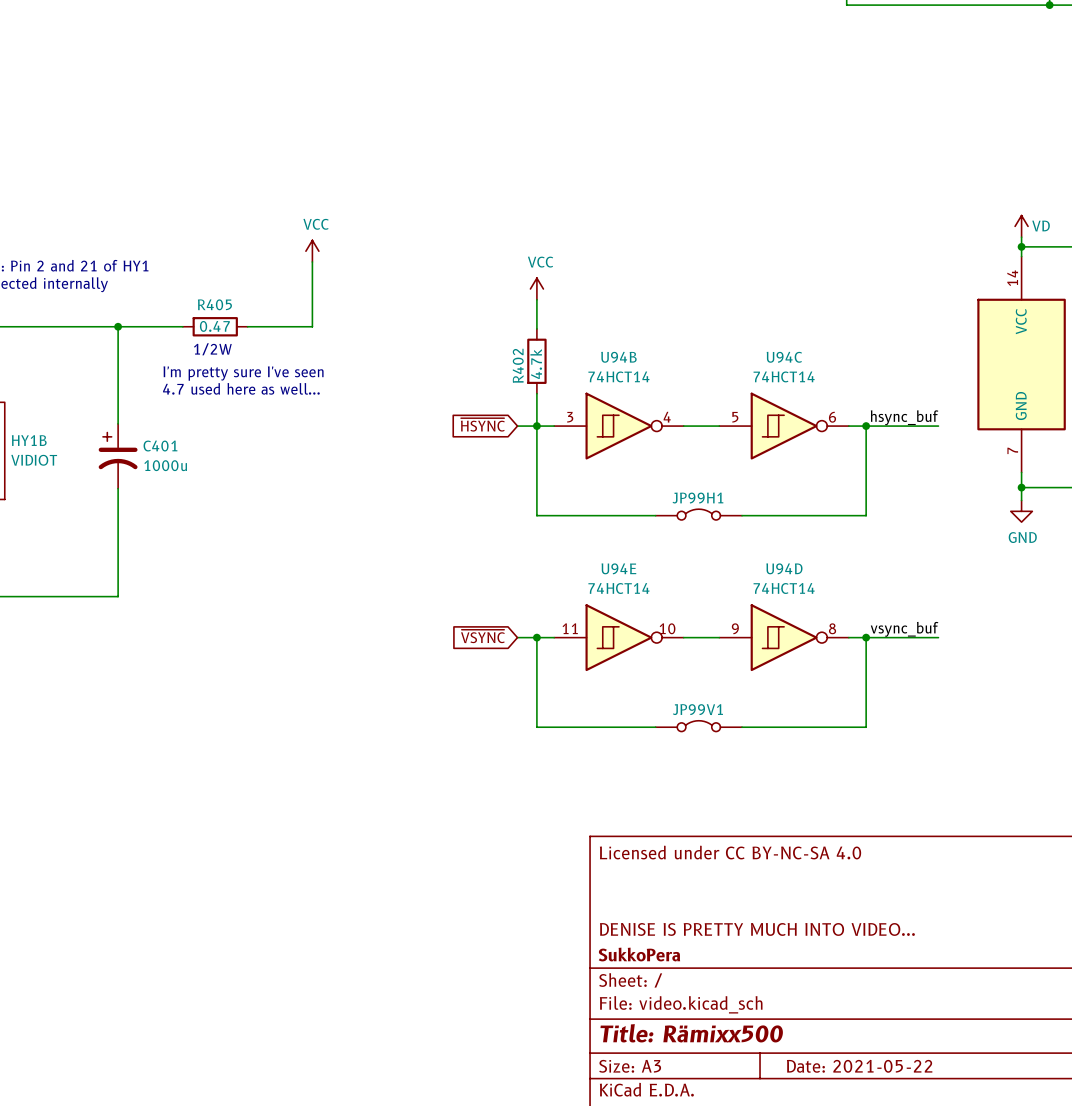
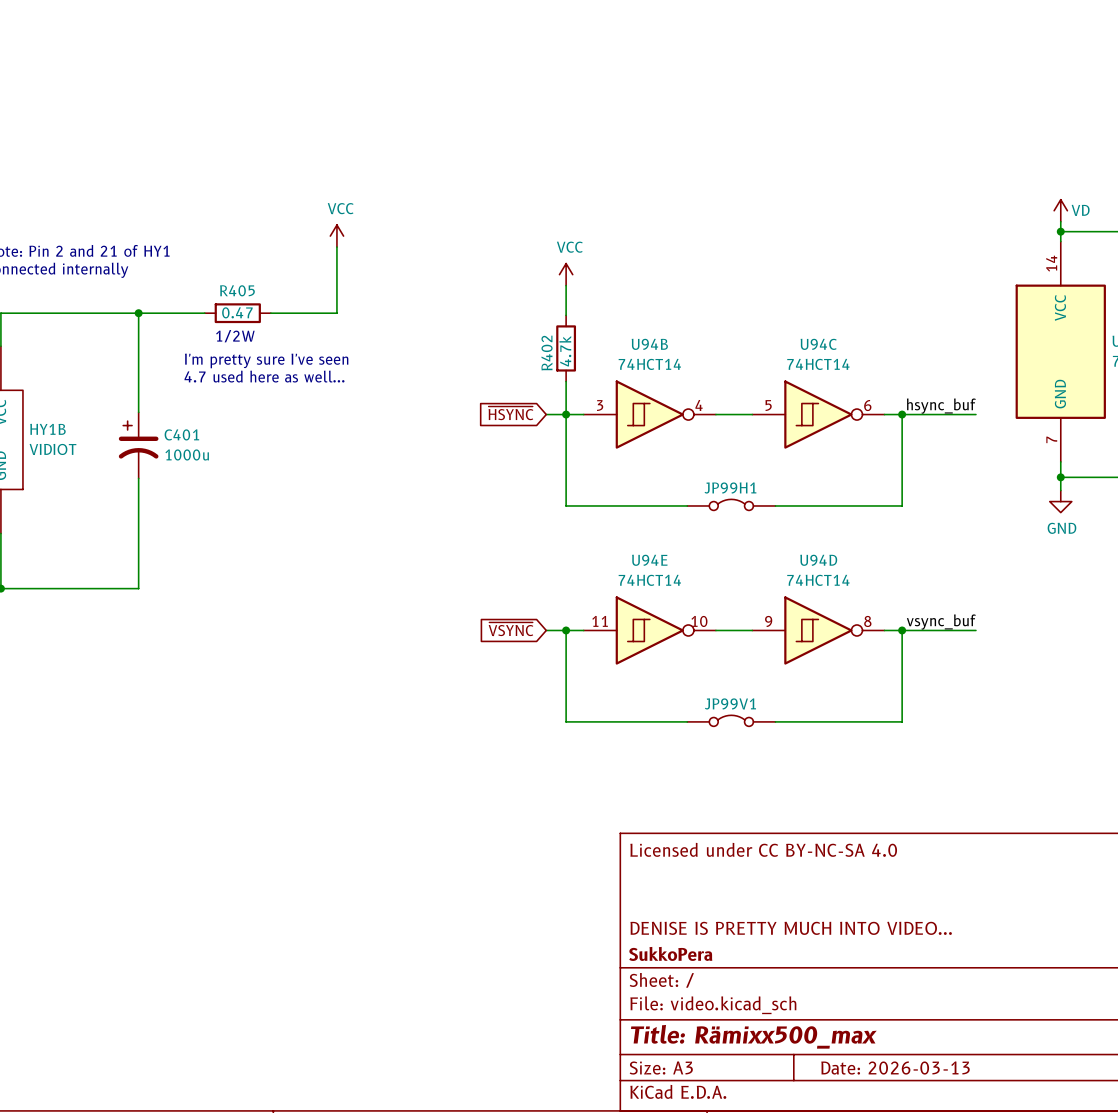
title block: Title: Rämixx500 (691, 1033) -> Title: Rämixx500_max (753, 1036)
title block: Date: 2021-05-22 (859, 1066) -> Date: 2026-03-13 (895, 1068)

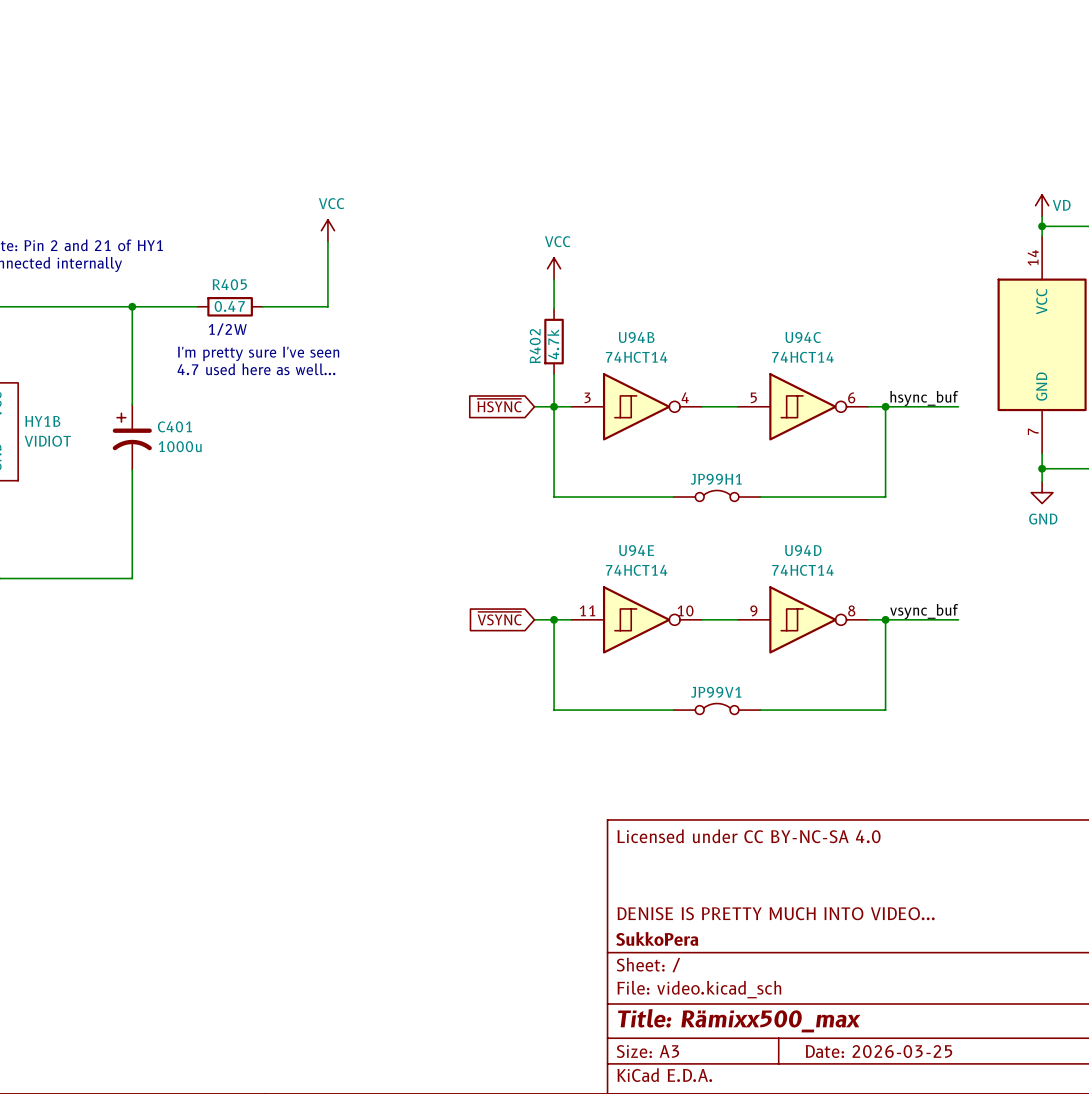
title block: Date: 2026-03-13 (895, 1068) -> Date: 2026-03-25 (879, 1051)

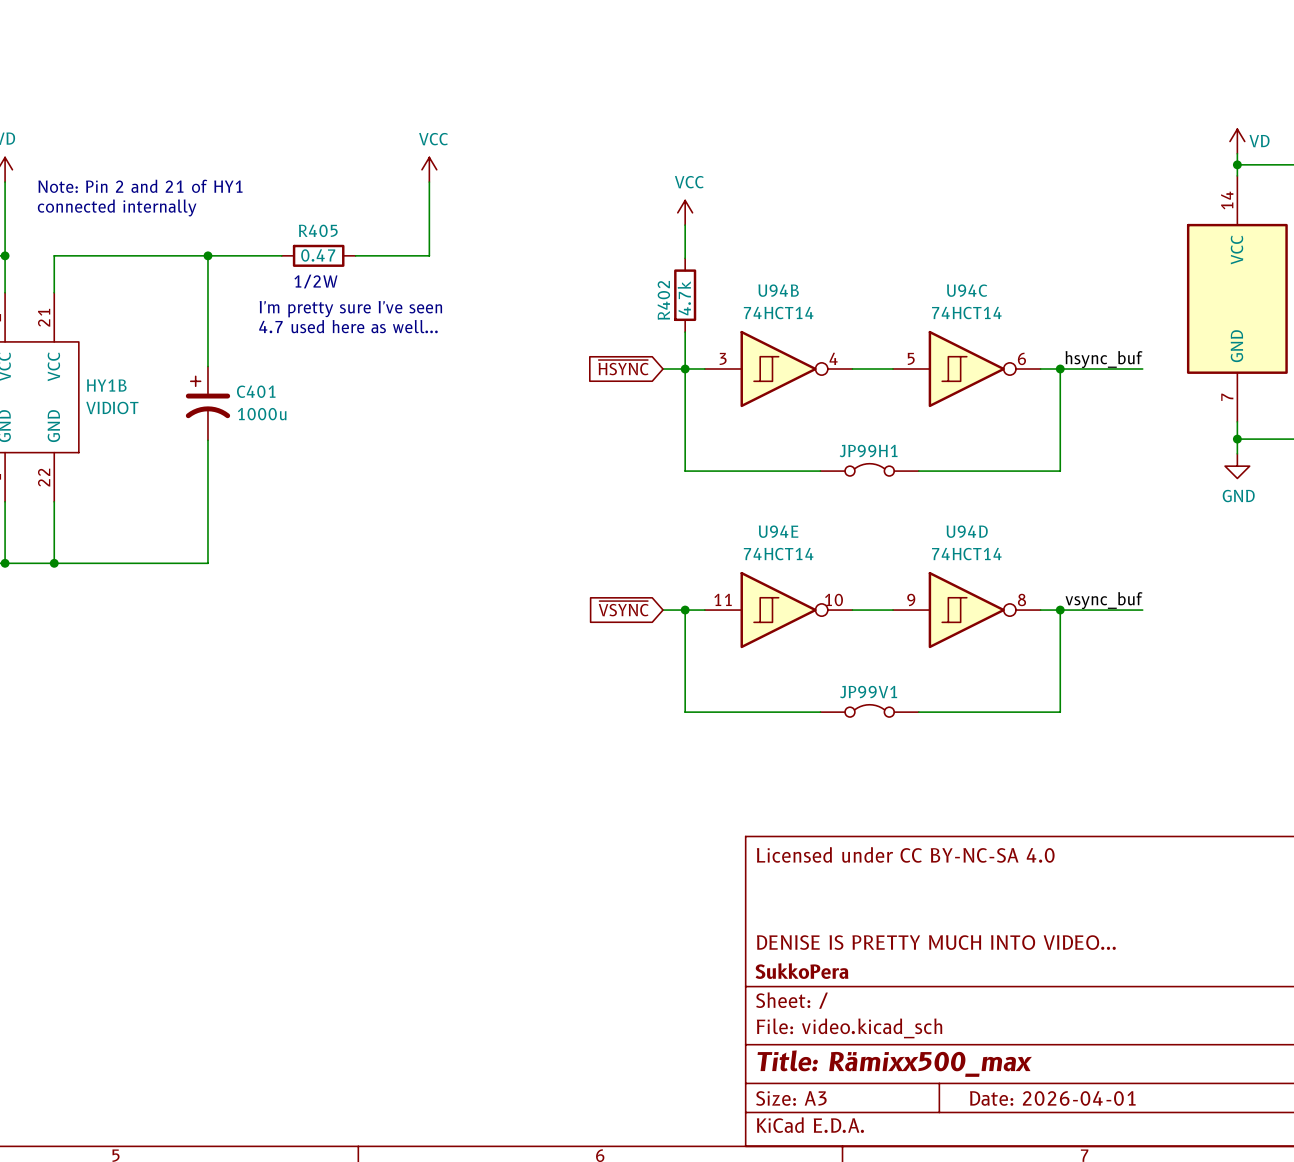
title block: Date: 2026-03-25 (879, 1051) -> Date: 2026-04-01 (1052, 1098)

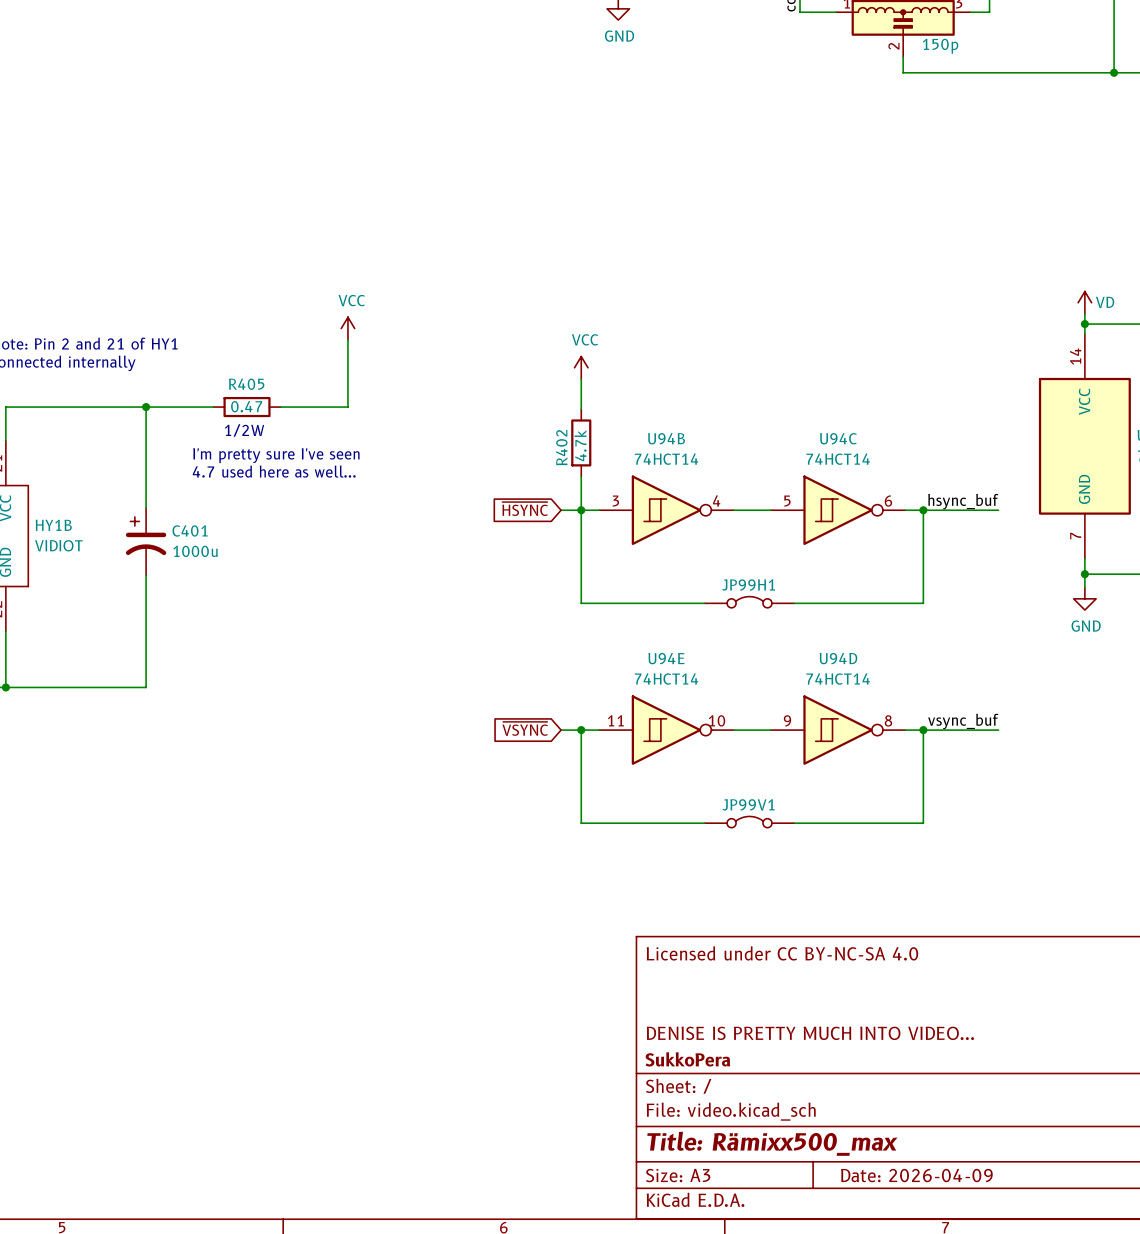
title block: Date: 2026-04-01 (1052, 1098) -> Date: 2026-04-09 (916, 1175)

